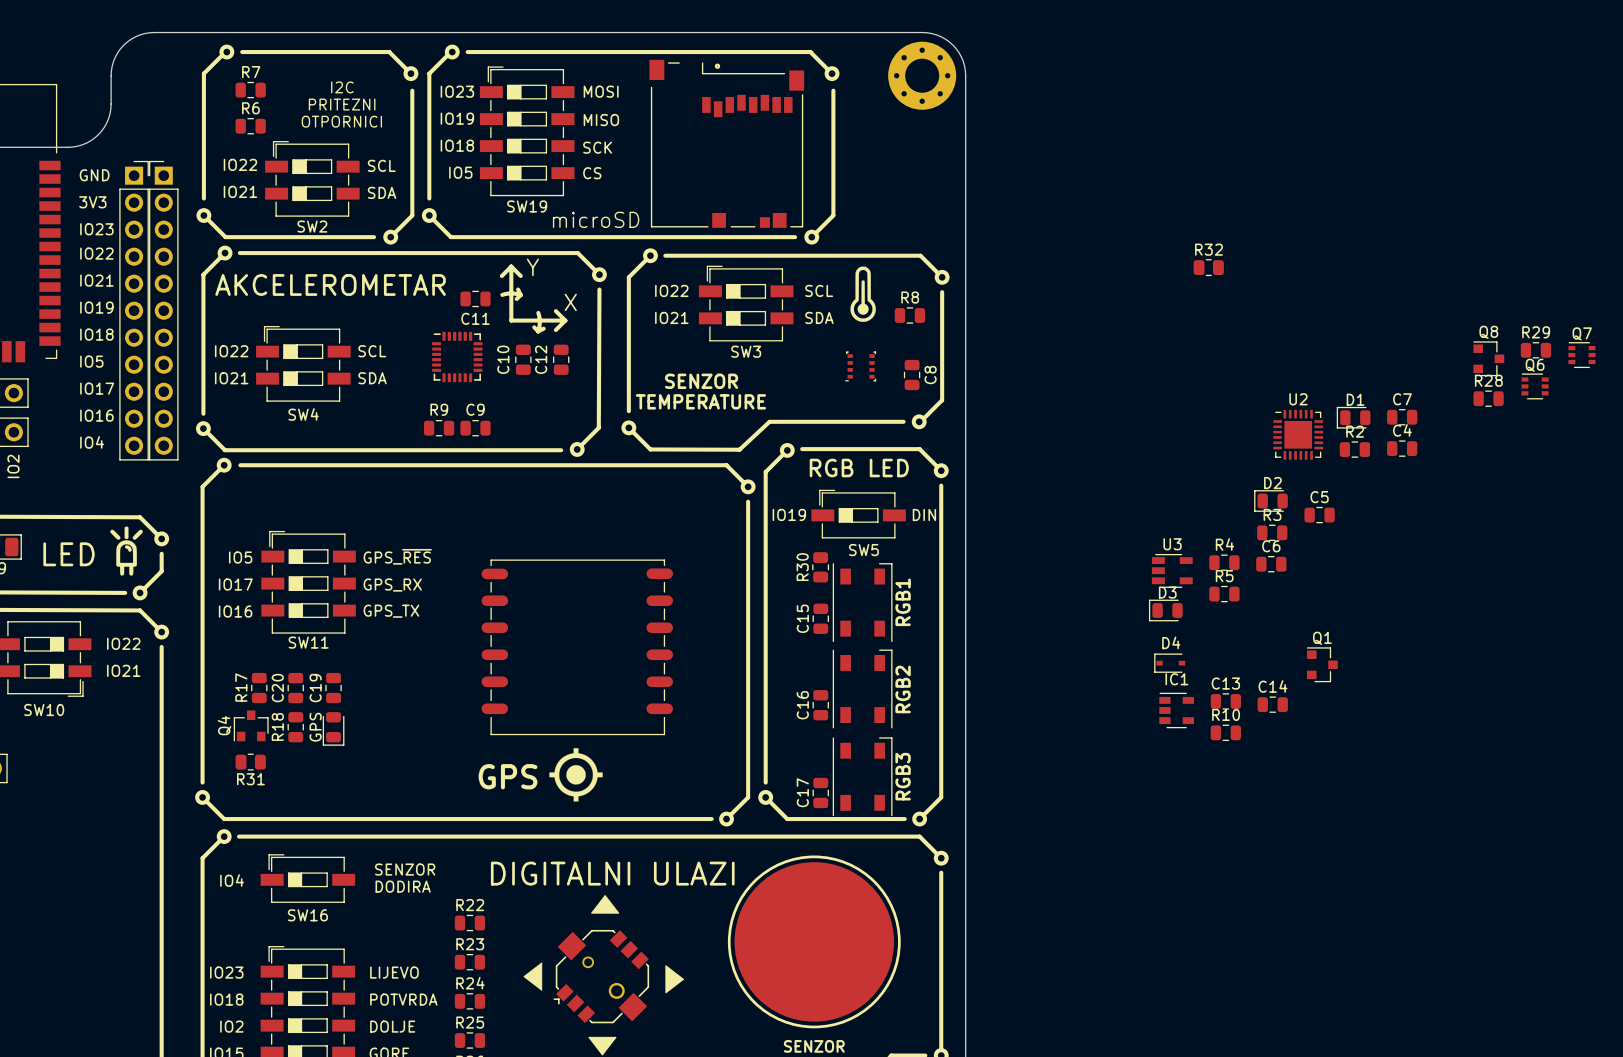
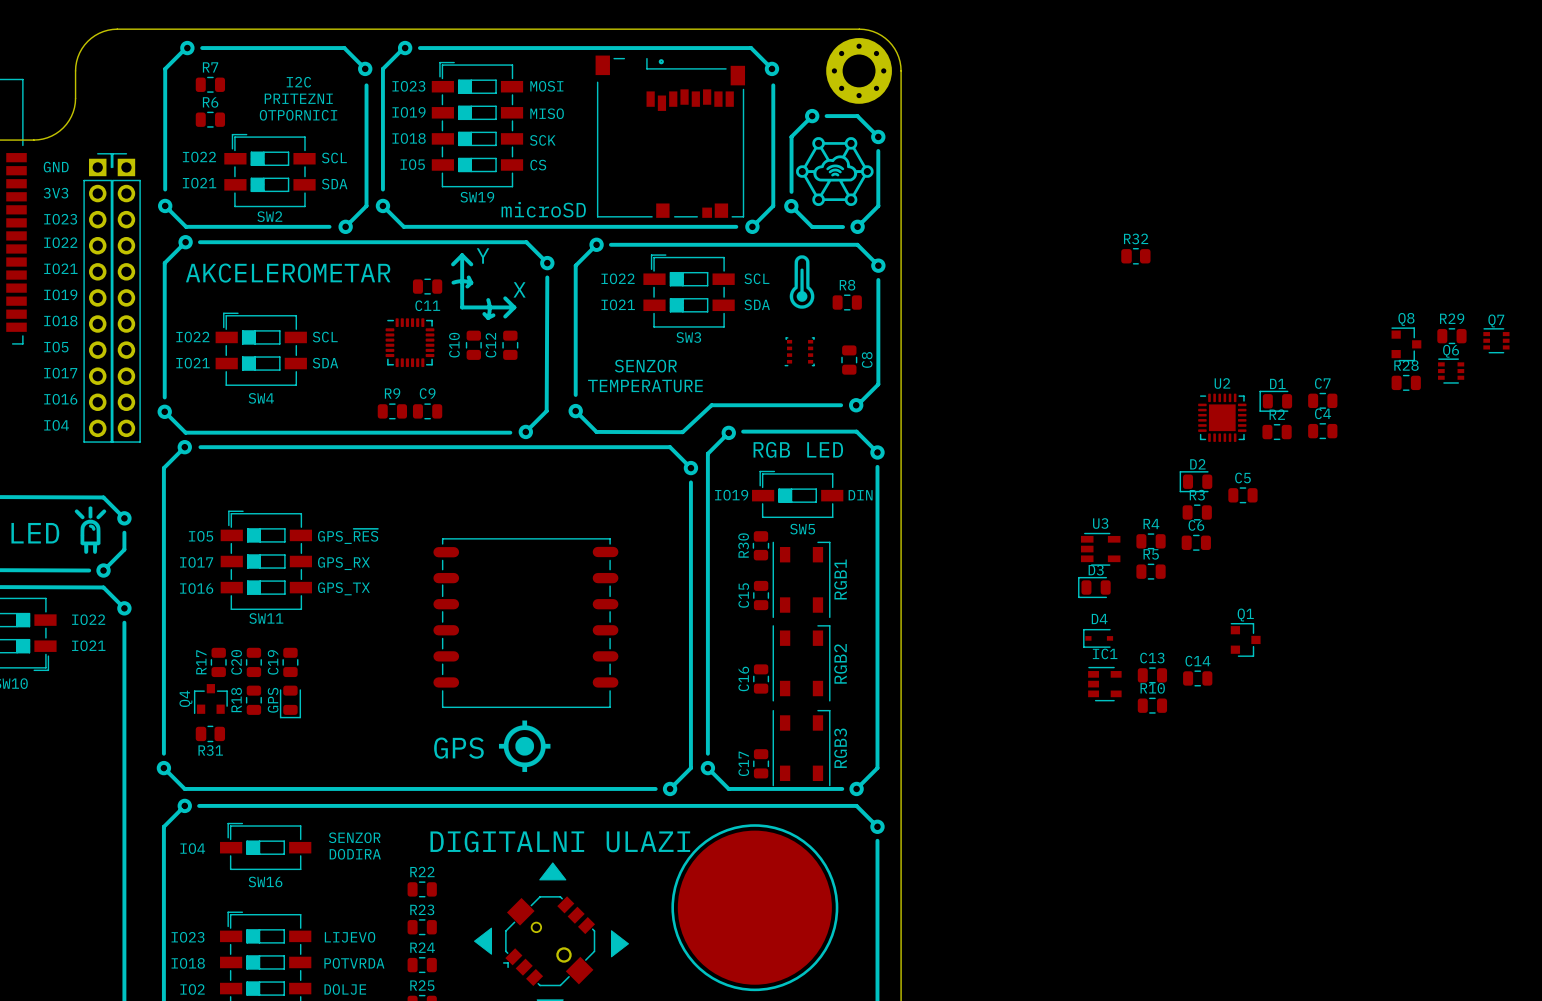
drawing: none -> [805, 108, 820, 124]
line: none -> (826, 116) (857, 116) (874, 133)
line: none -> (808, 119) (791, 136)
drawing: none -> [784, 129, 886, 214]
line: none -> (791, 136) (791, 191)
line: none -> (878, 151) (878, 205)
line: none -> (878, 205) (861, 222)
line: none -> (795, 210) (812, 227) (843, 227)
drawing: none -> [850, 219, 865, 234]

